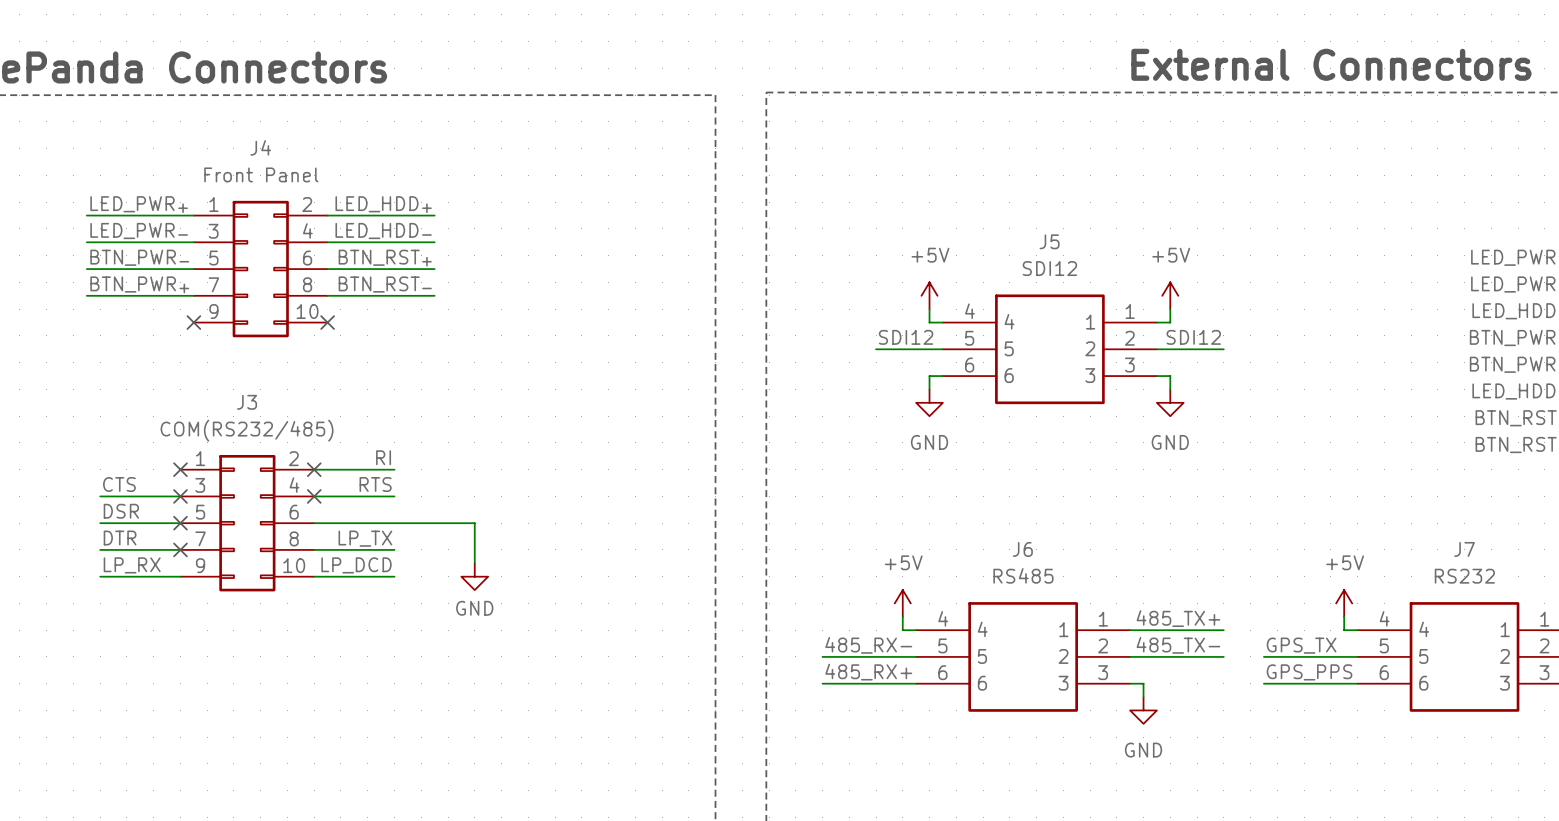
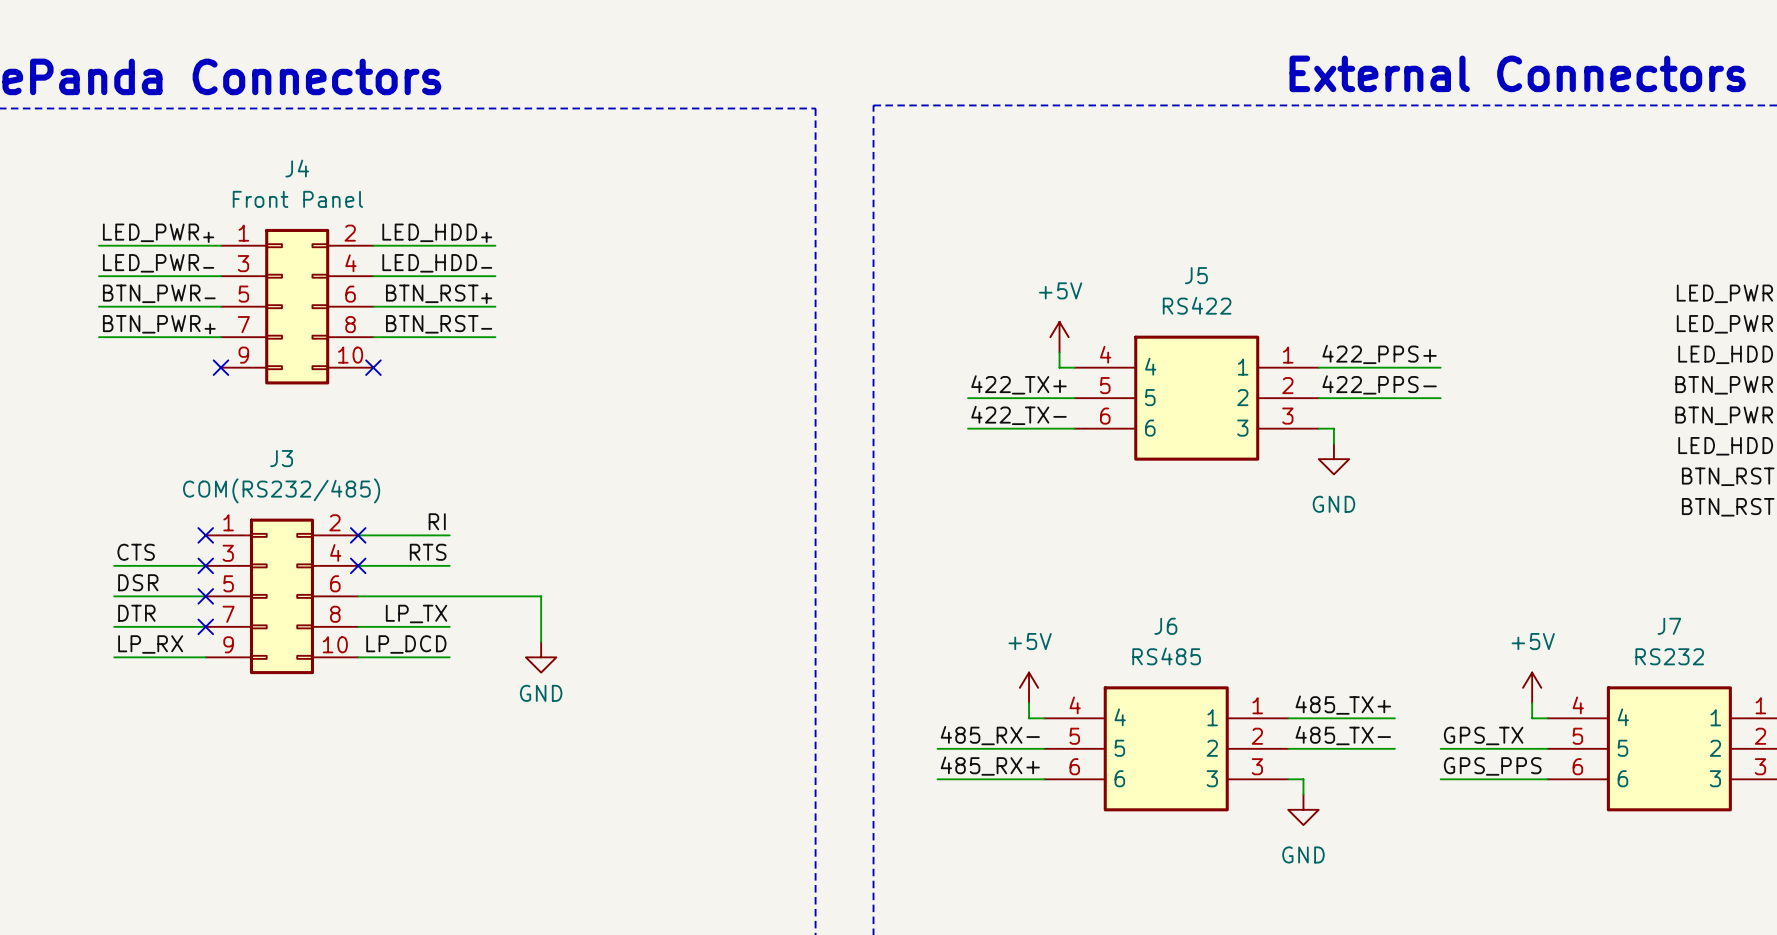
J5 value: SDI12 (1049, 268) -> RS422 (1197, 305)
power symbol: +5V (1170, 295) -> none
wire: (1170, 309) (1170, 322) -> (1440, 367) (1333, 367)
label: none -> 422_PPS+ (1379, 354)
label: none -> 422_TX+ (1018, 384)
label: SDI12 (906, 337) -> none
label: SDI12 (1193, 337) -> none
label: none -> 422_PPS- (1379, 384)
wire: none -> (968, 398) (998, 398)
wire: none -> (1394, 398) (1440, 398)
label: none -> 422_TX- (1018, 415)
wire: (929, 376) (929, 389) -> (1059, 428) (968, 428)
power symbol: GND (929, 402) -> none

